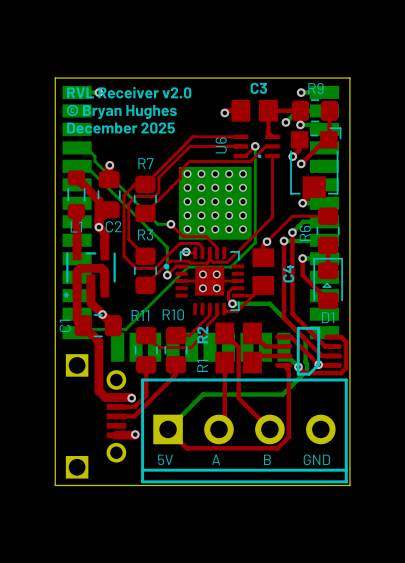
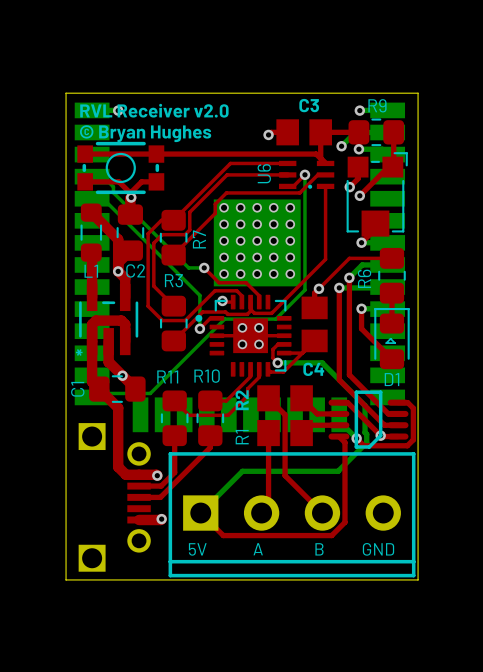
top track: none -> (85, 154) (316, 154) (320, 158)
text: December 2025 (121, 128) -> none
part: none -> (120, 167)
top track: none -> (85, 181) (119, 181) (130, 193) (141, 181) (156, 181)
R7 name rotation: 0° (145, 163) -> 90° counterclockwise (199, 239)
R7 name position: R7 (145, 163) -> R7 (199, 239)
C4 name rotation: 0° (288, 273) -> 90° clockwise (313, 369)
C4 name position: C4 (288, 273) -> C4 (313, 369)

